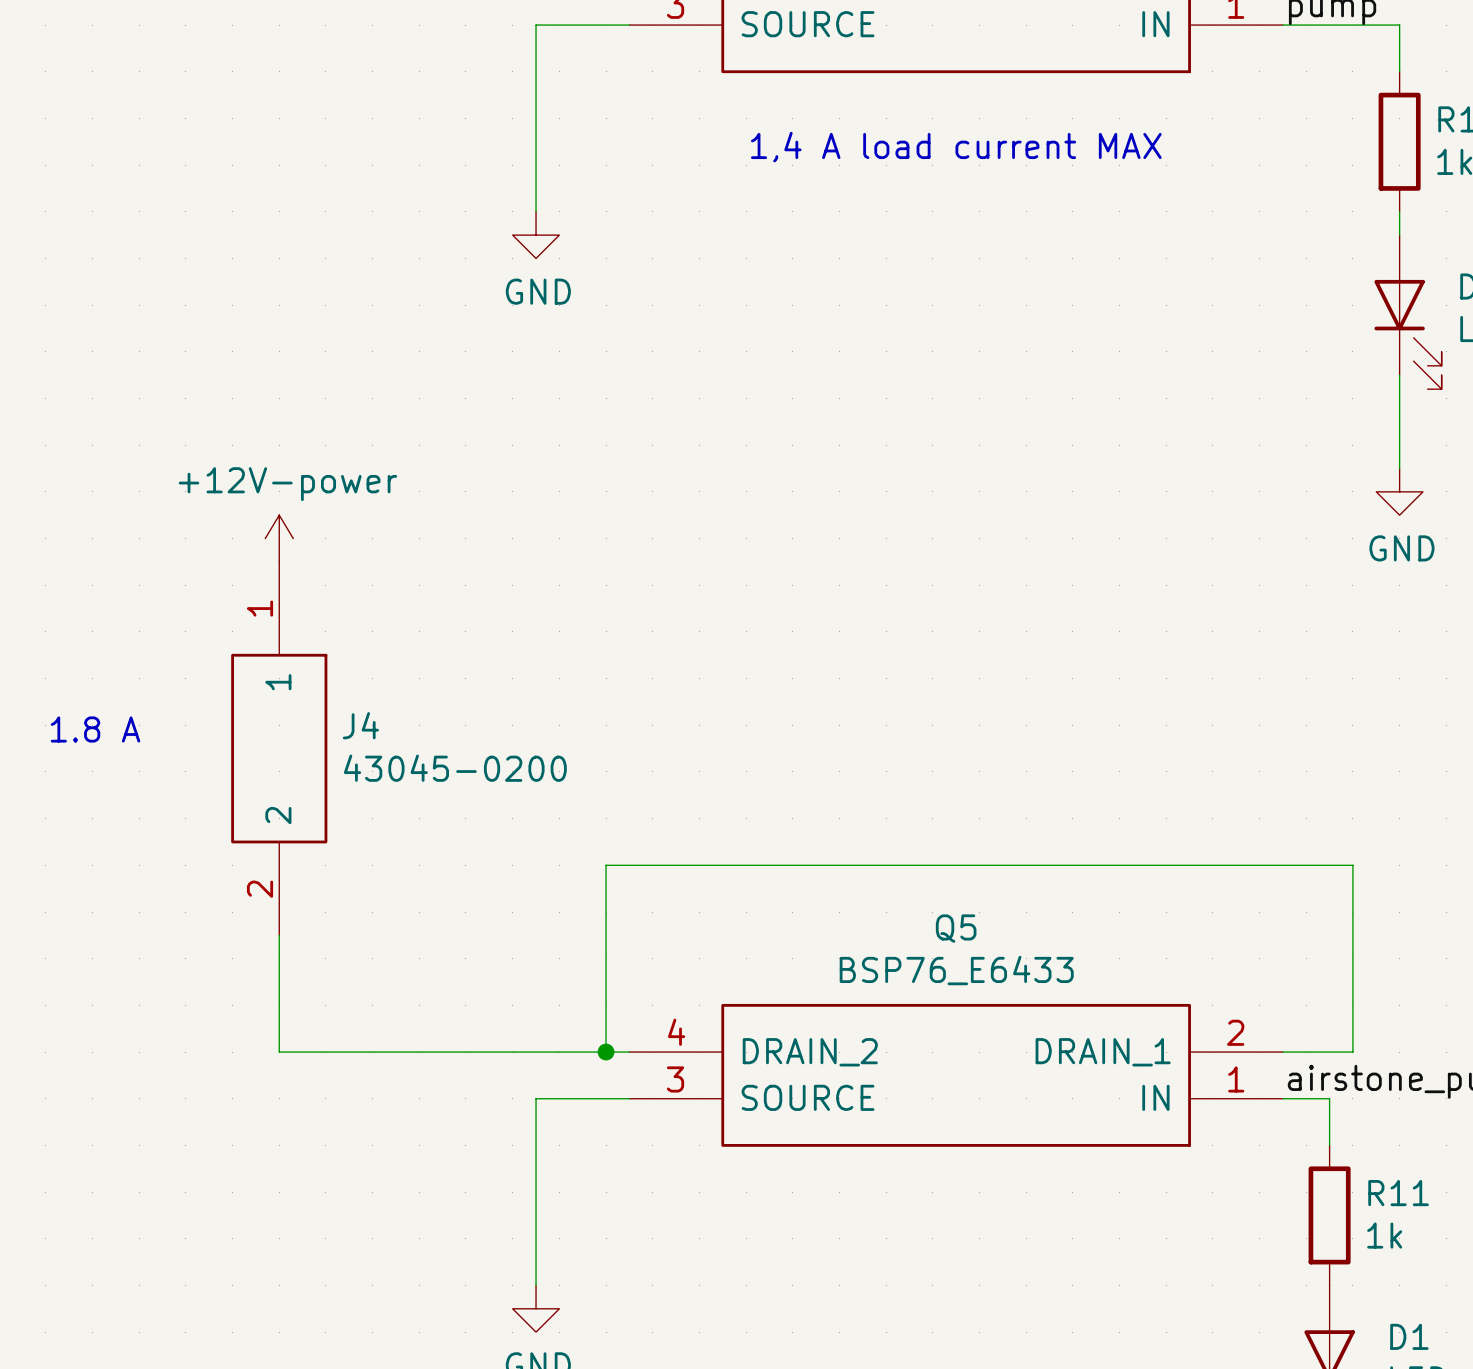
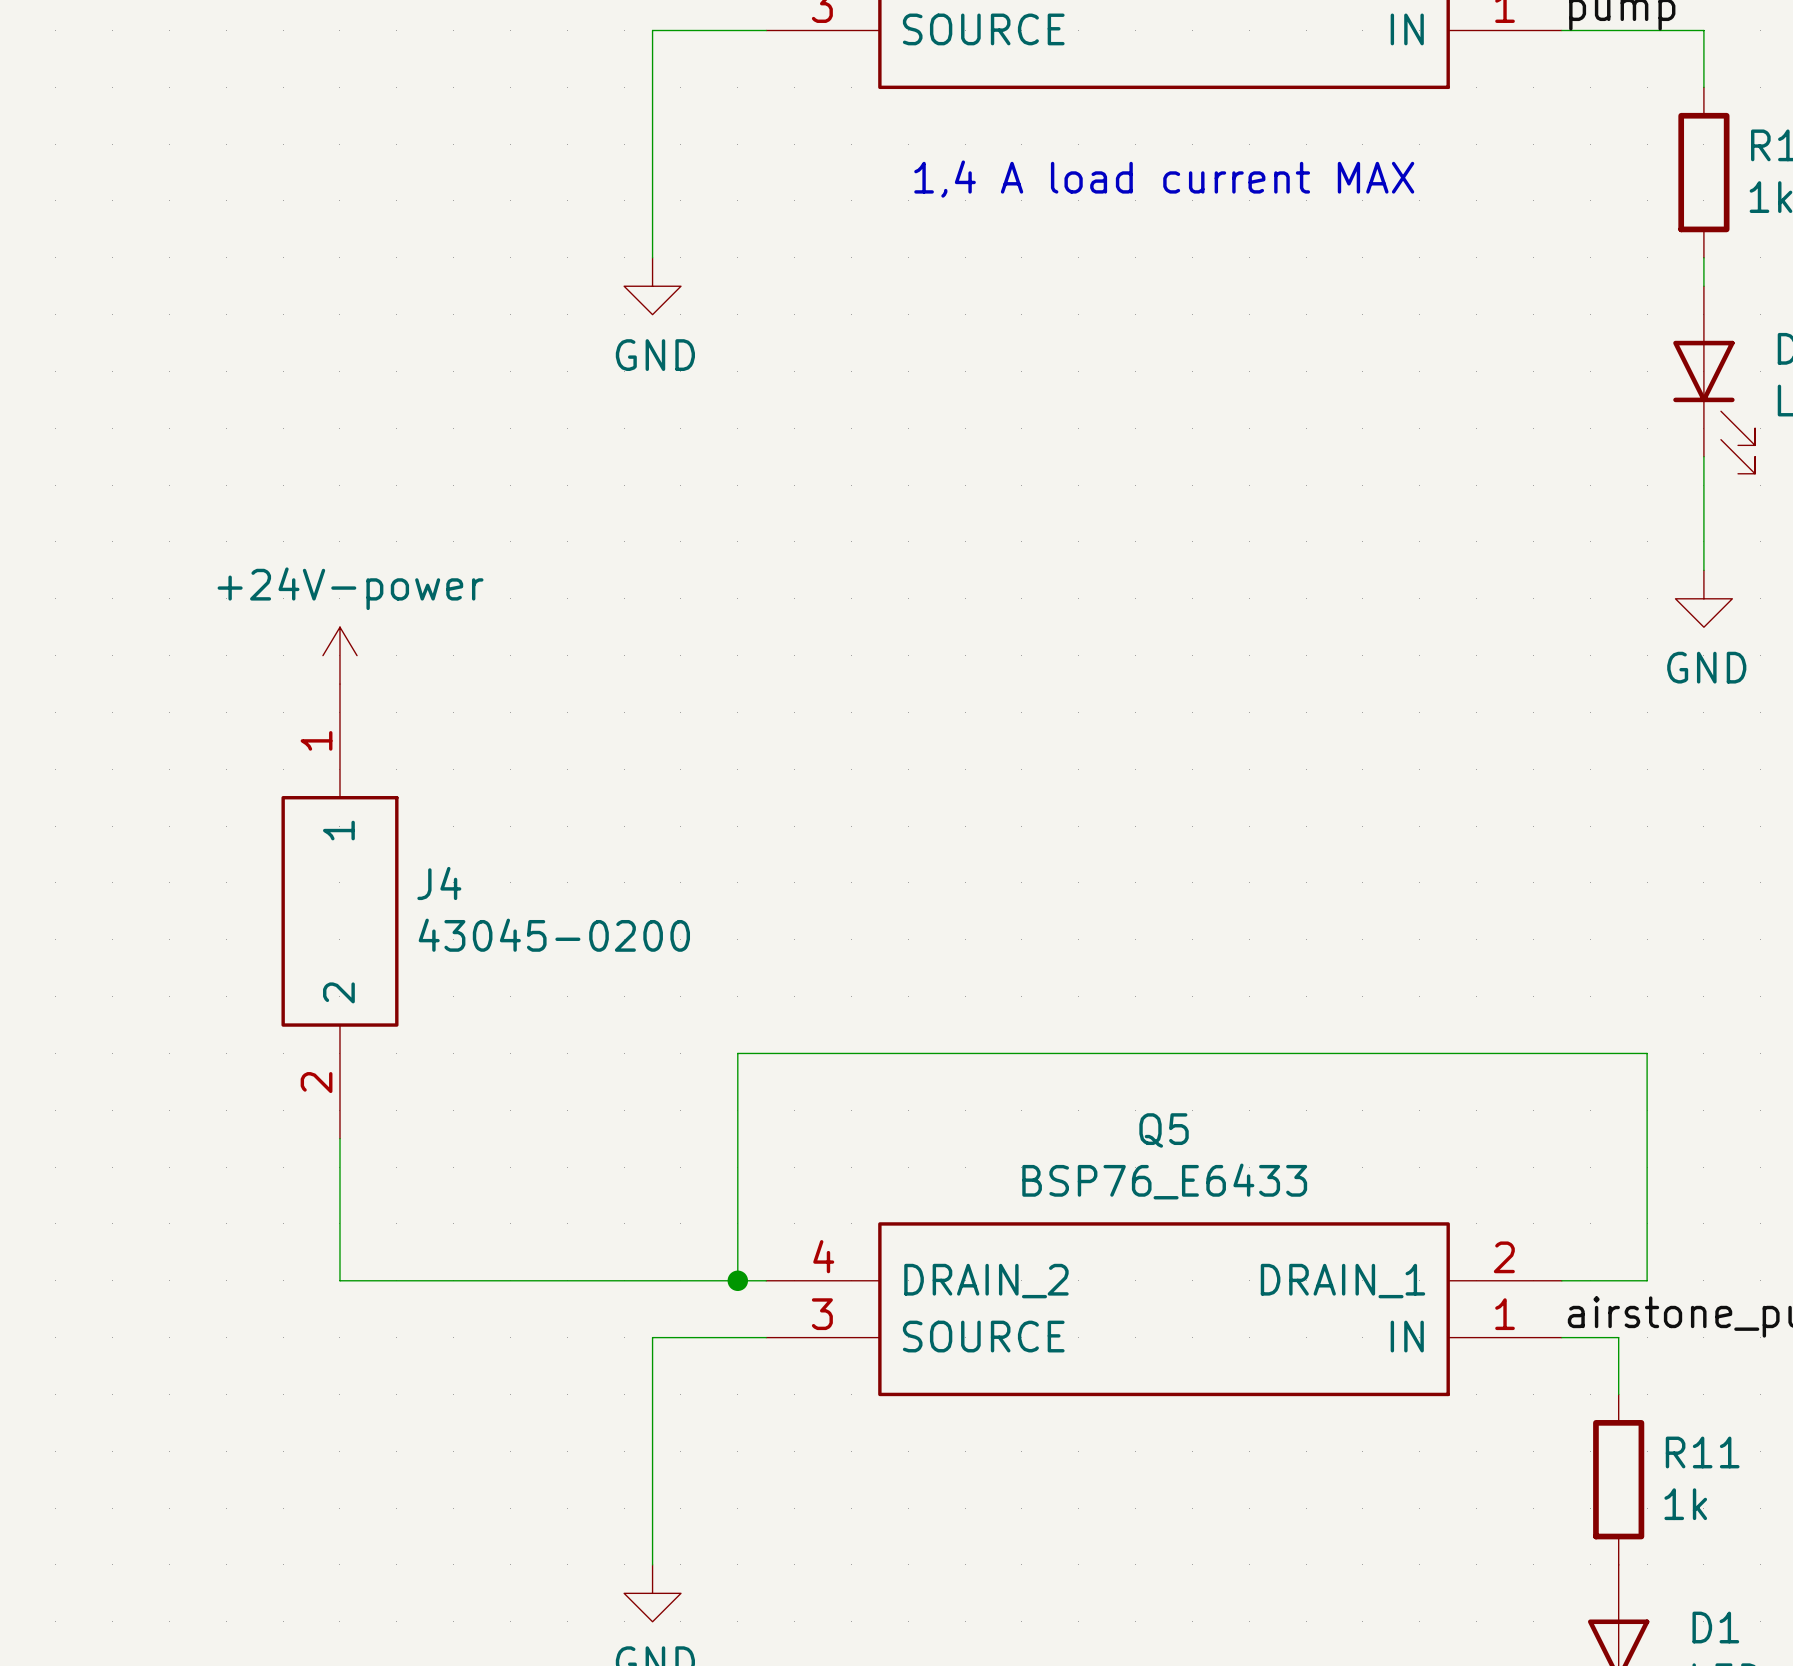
power symbol: +12V-power (279, 538) -> +24V-power (339, 655)
text: 1.8 A (95, 729) -> none

